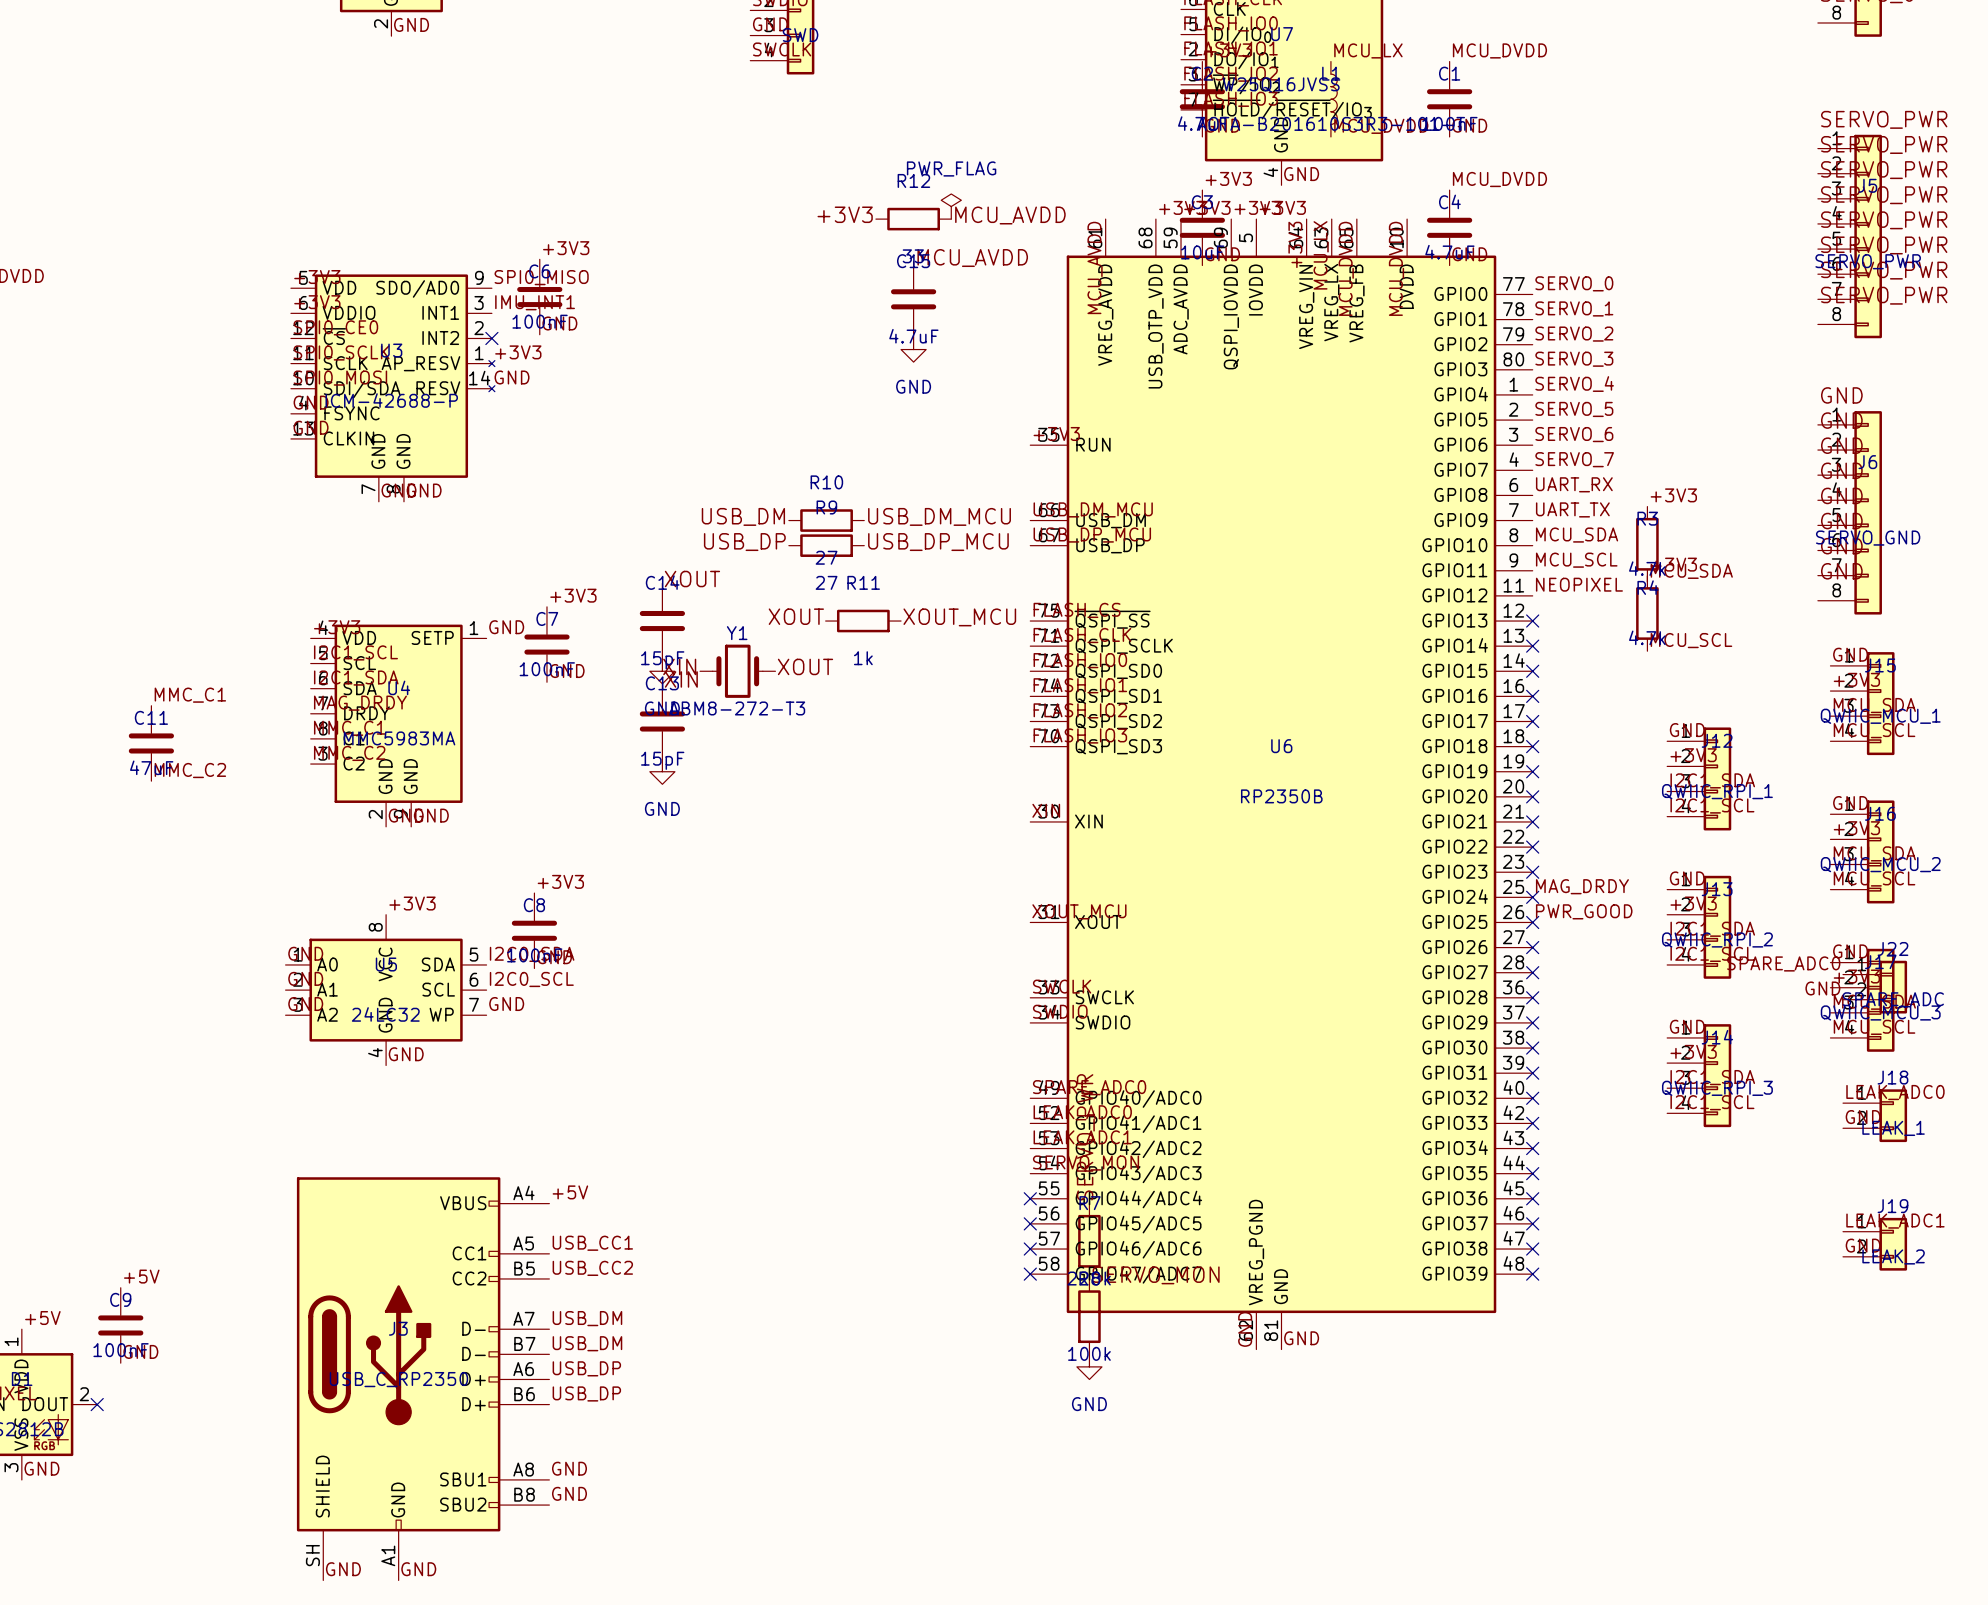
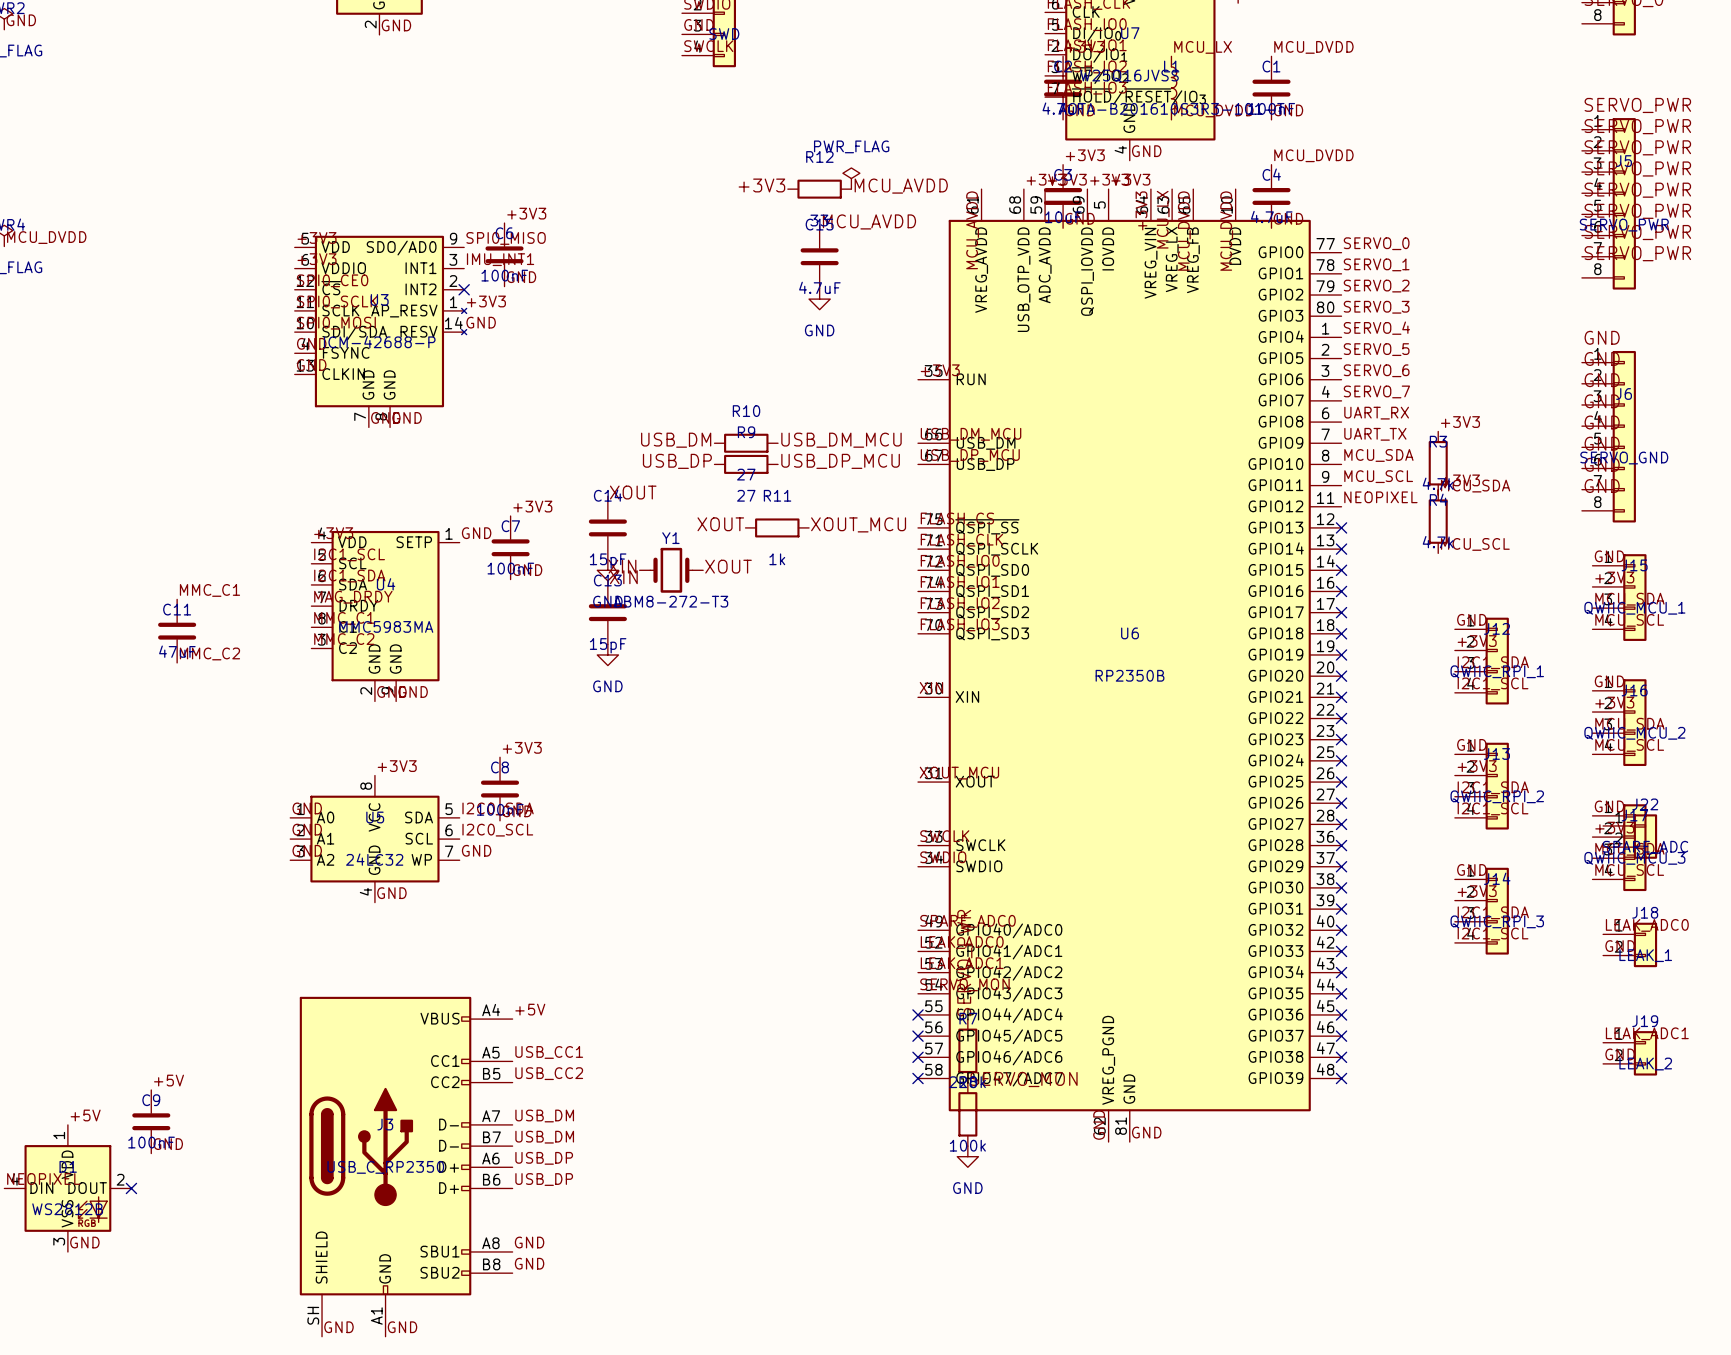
label: MAG_DRDY (1582, 886) -> none
label: PWR_GOOD (1584, 911) -> none
label: SPARE_ADC0 (1783, 963) -> none
label: GND (1822, 988) -> none

